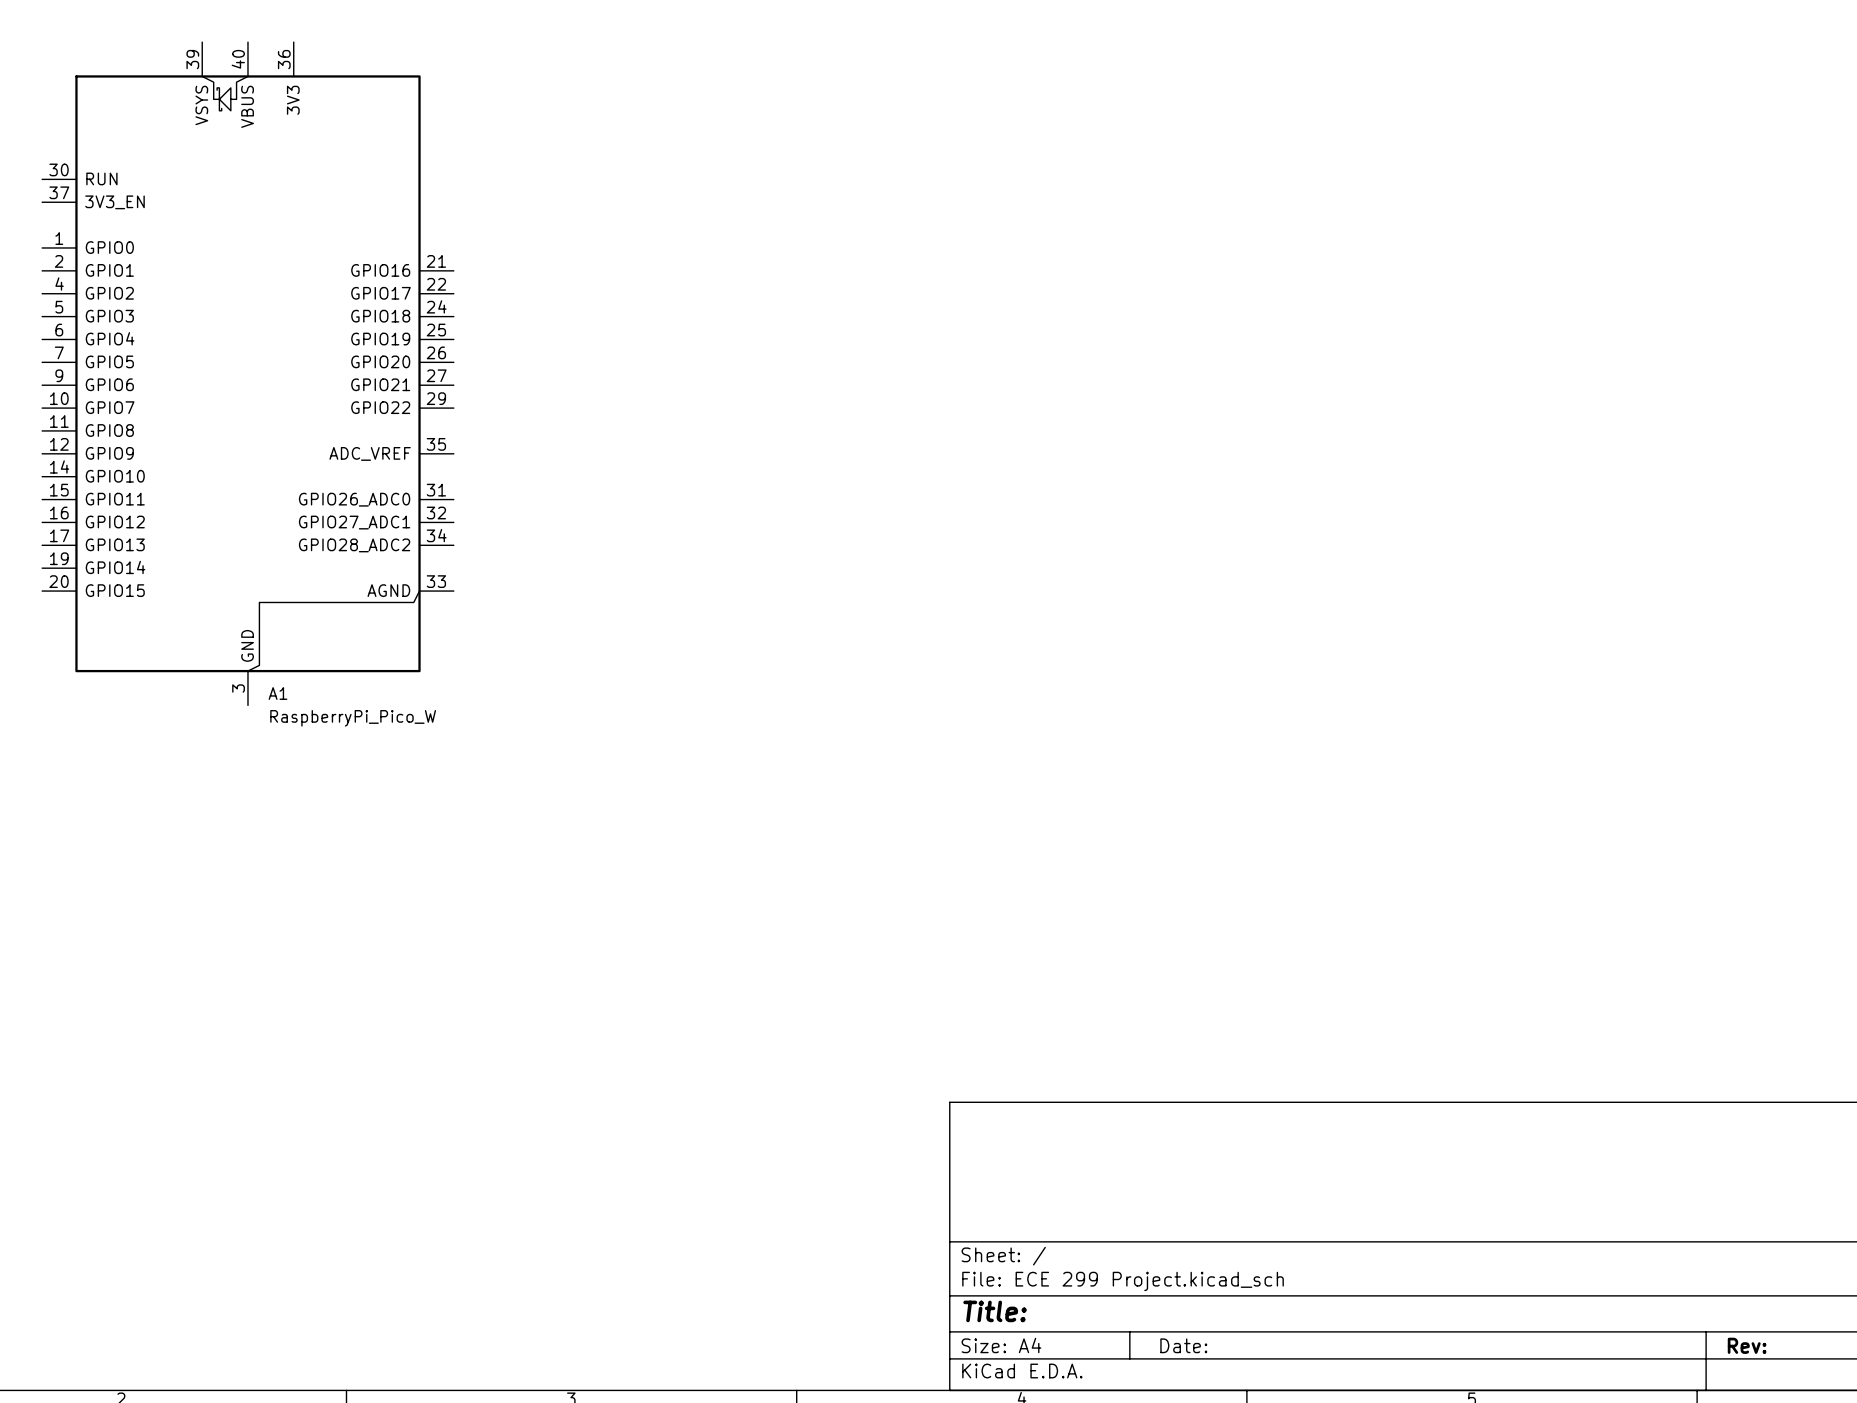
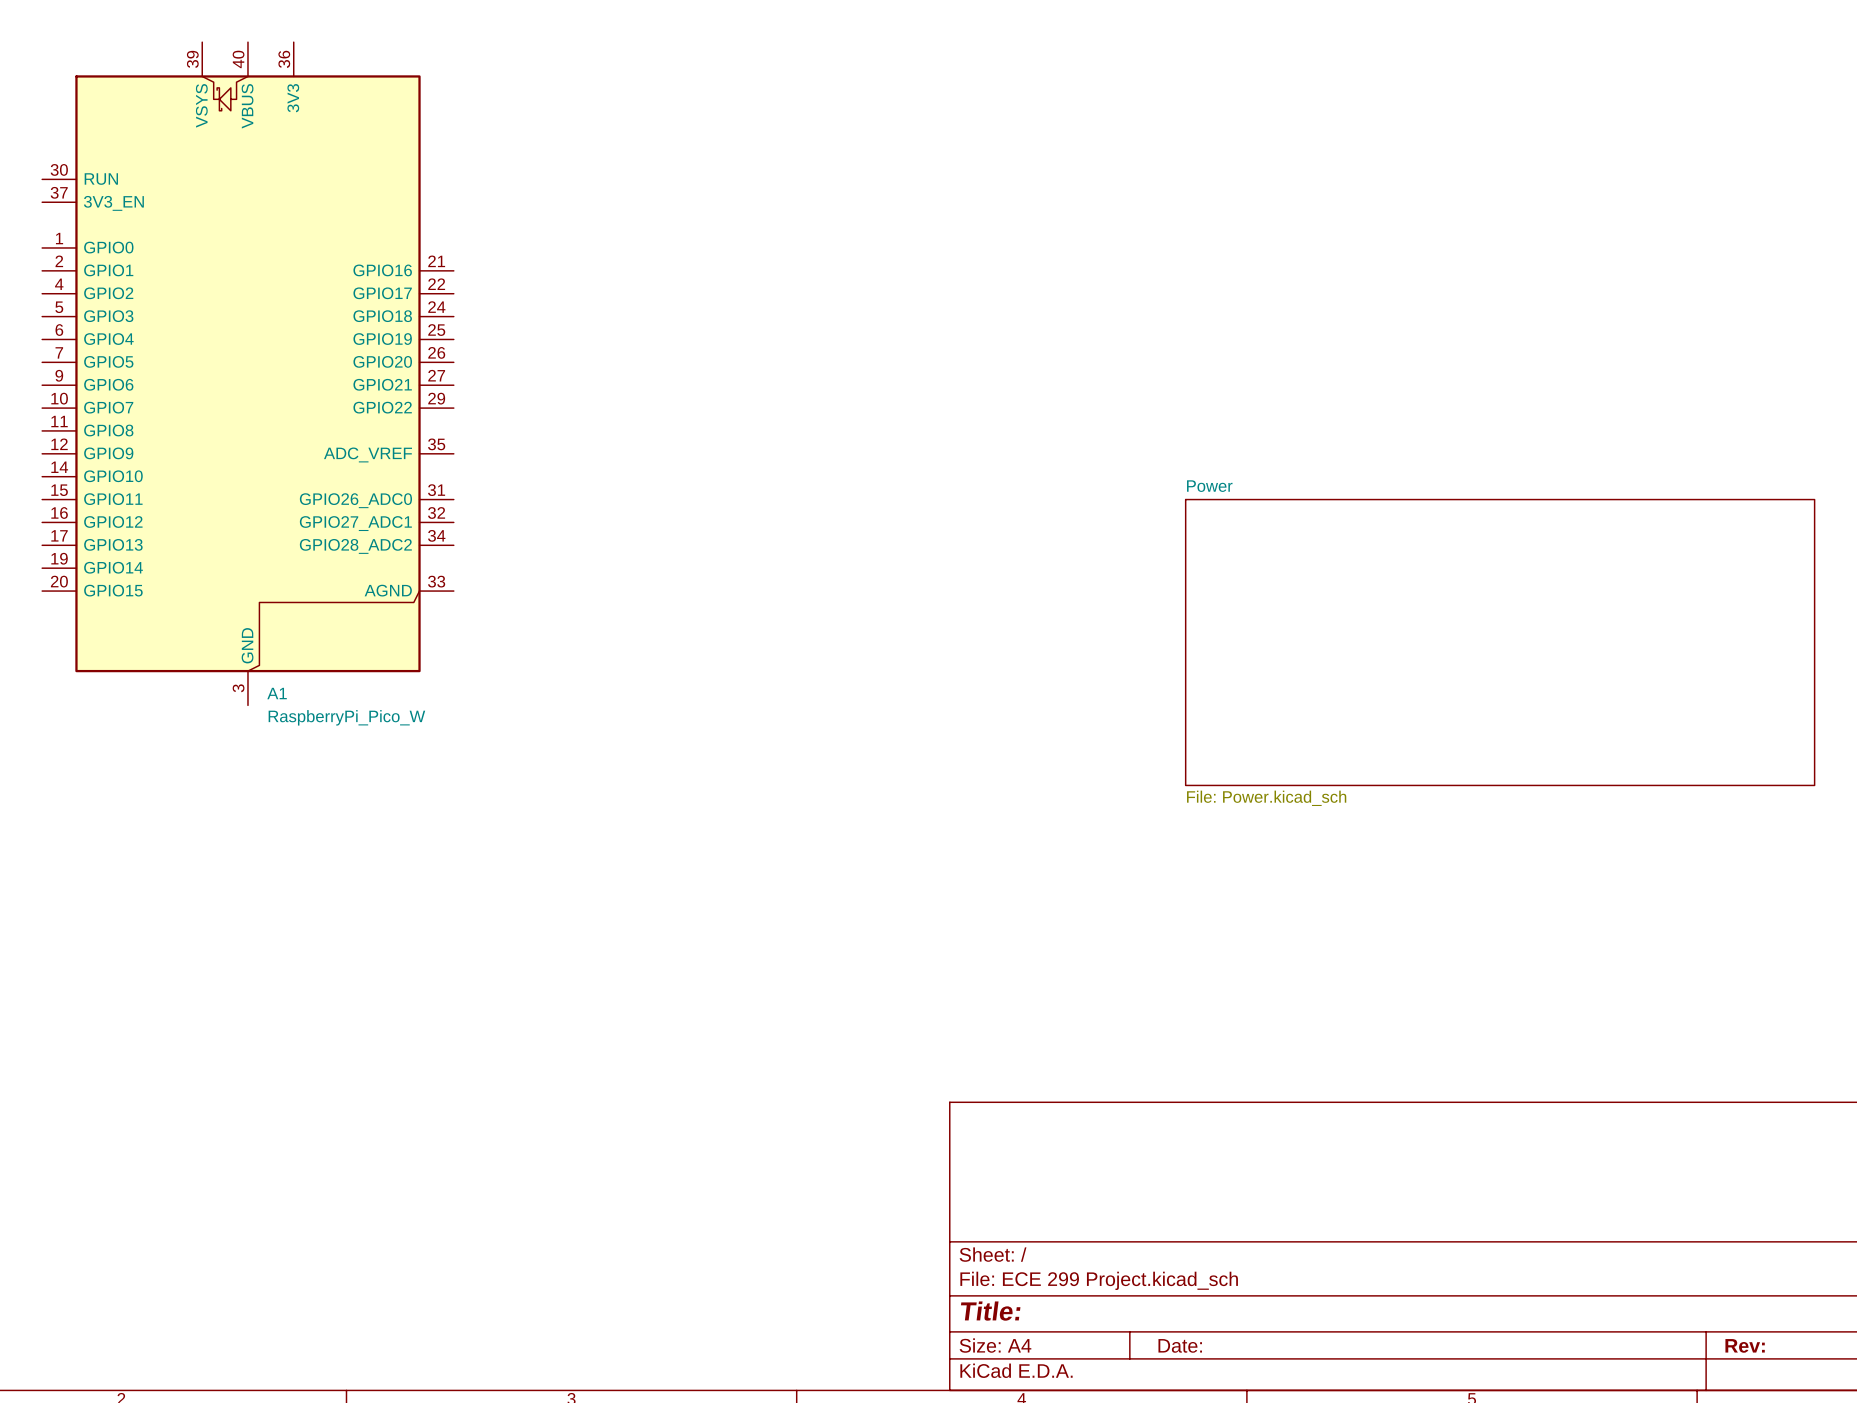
sheet Power: none -> File: Power.kicad_sch (1500, 642)

